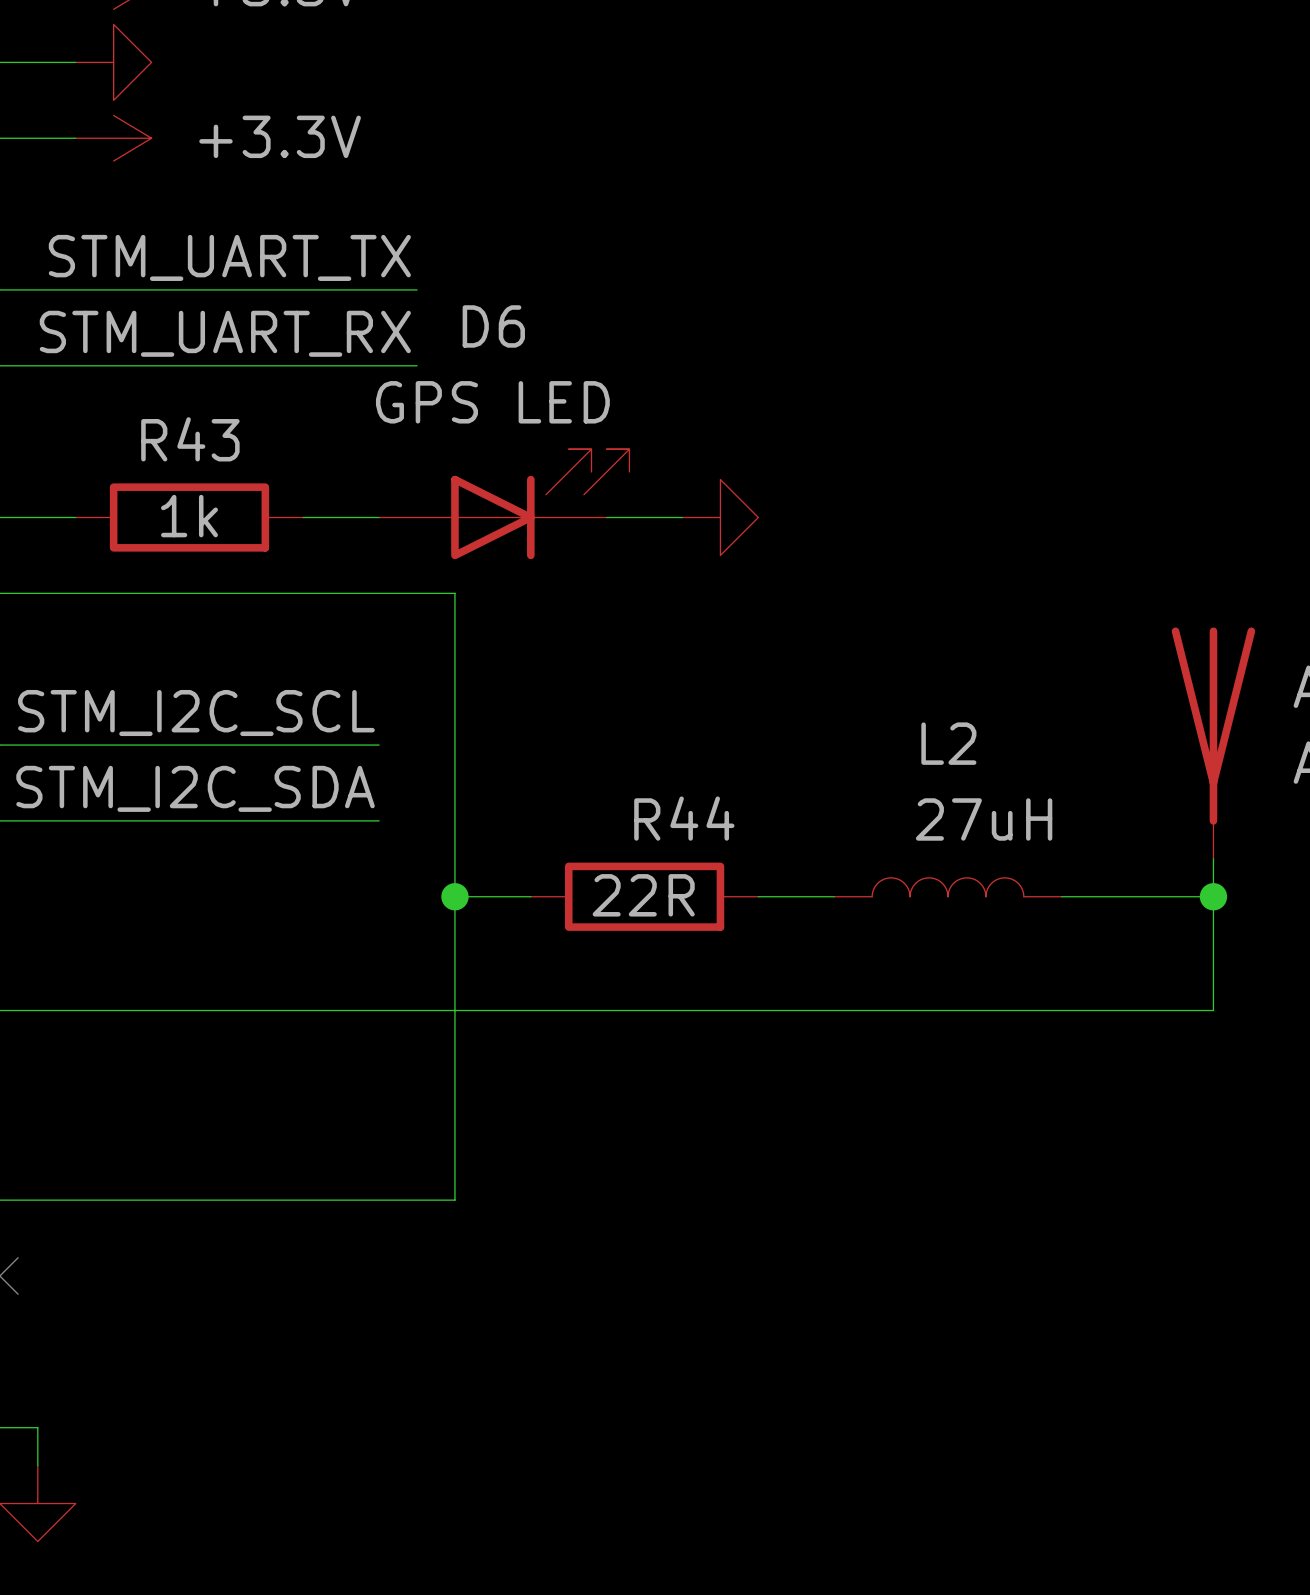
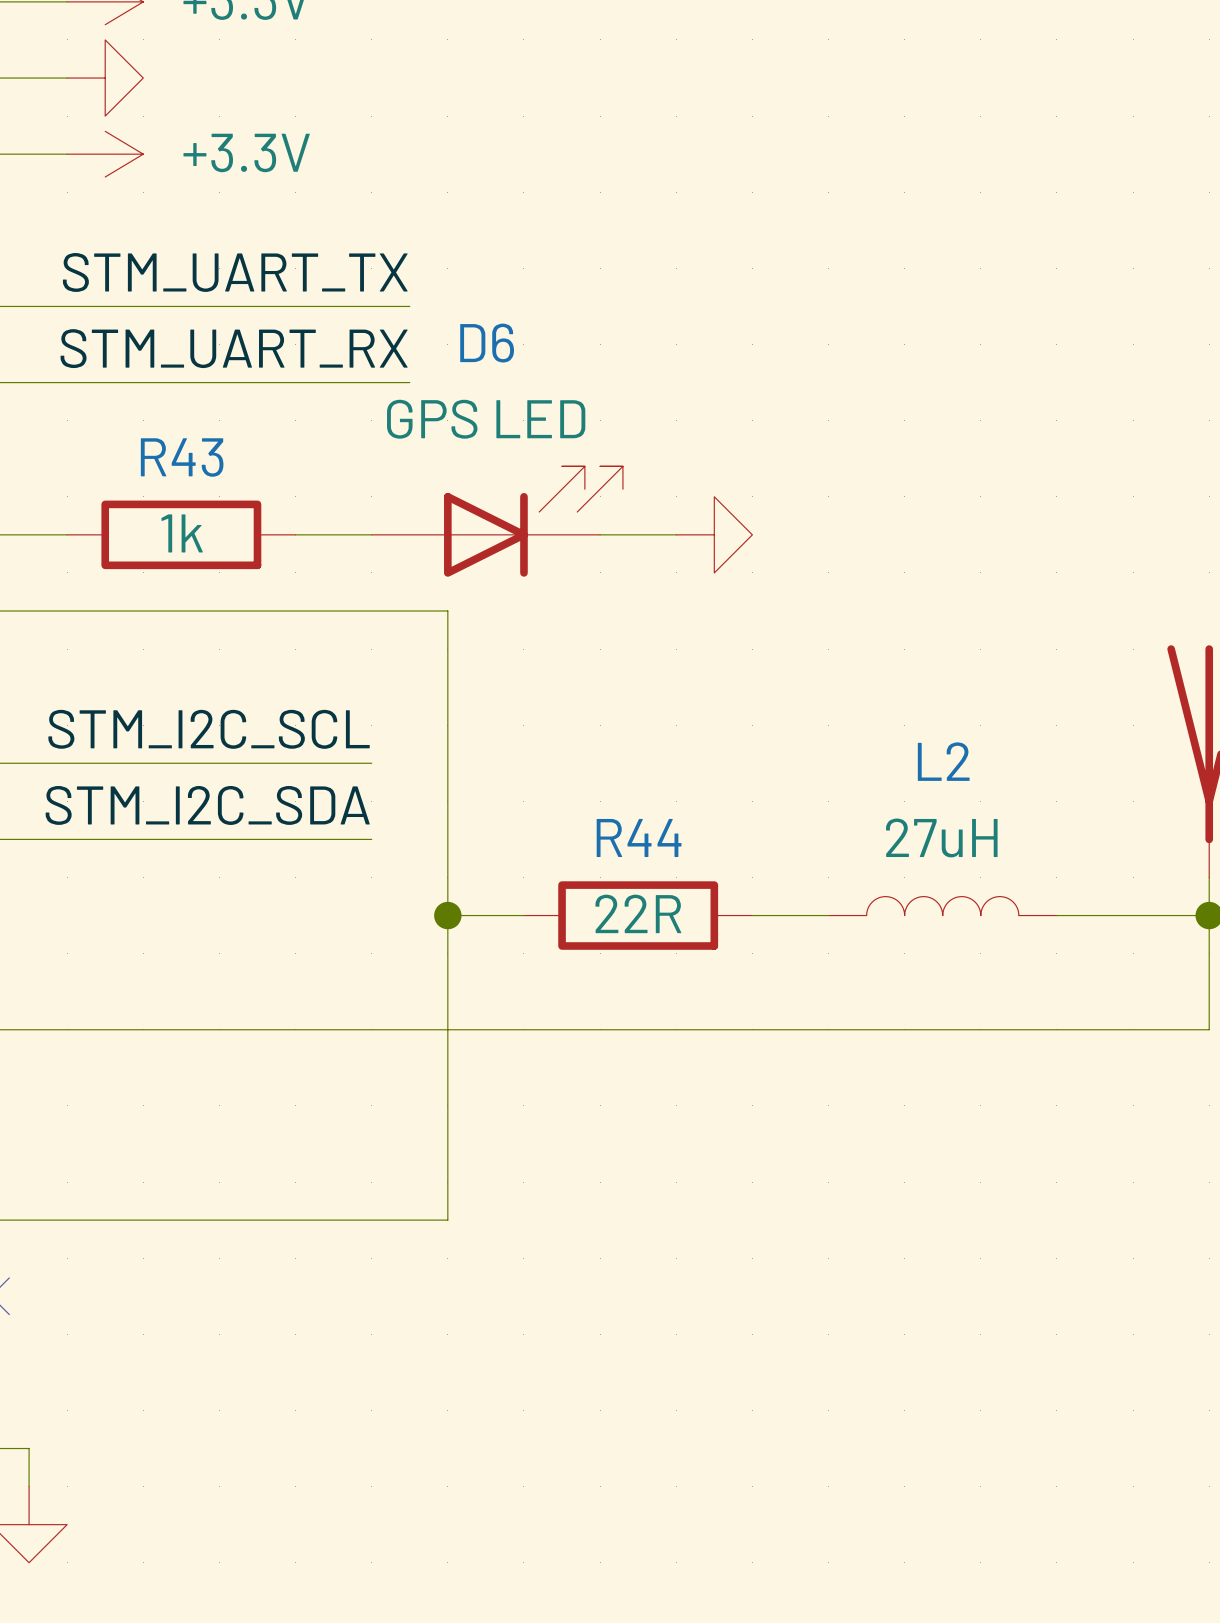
R44 name position: R44 (684, 818) -> R44 (639, 837)
L2 value position: 27uH (984, 819) -> 27uH (941, 837)

